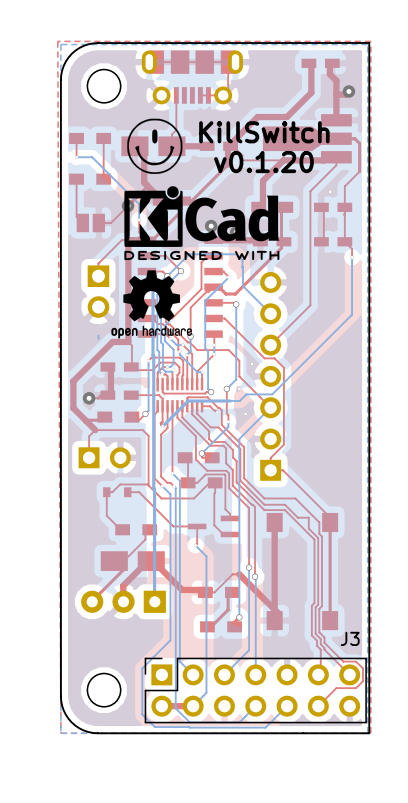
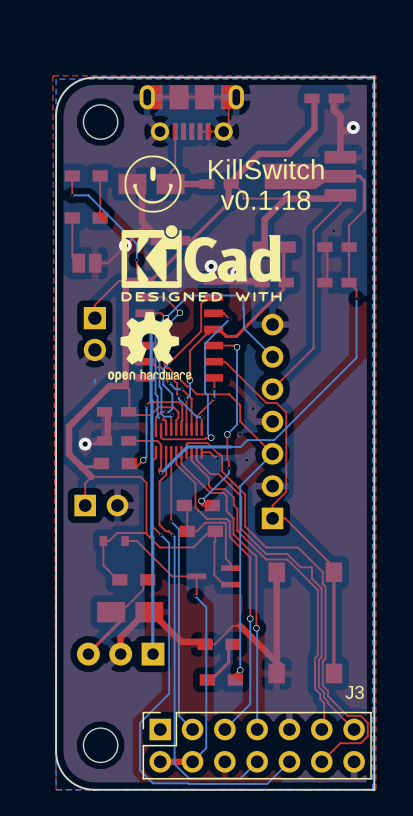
text: v0.1.20 (263, 162) -> v0.1.18 (265, 200)

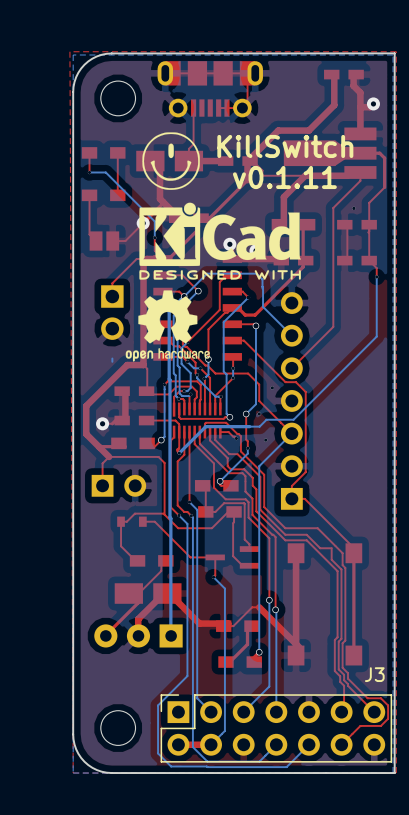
text: v0.1.18 (265, 200) -> v0.1.11 (284, 177)

